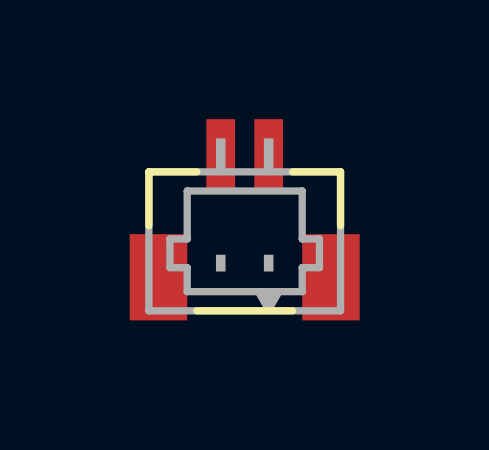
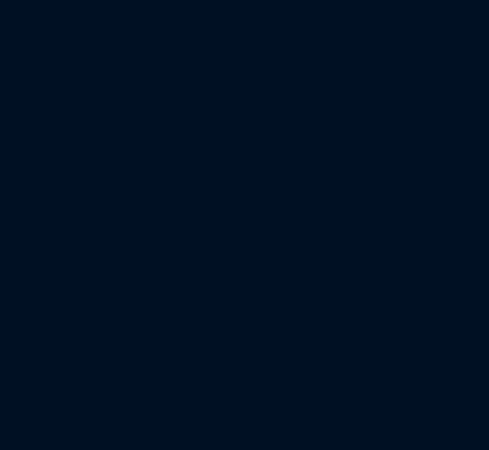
part: (244, 219) -> none

